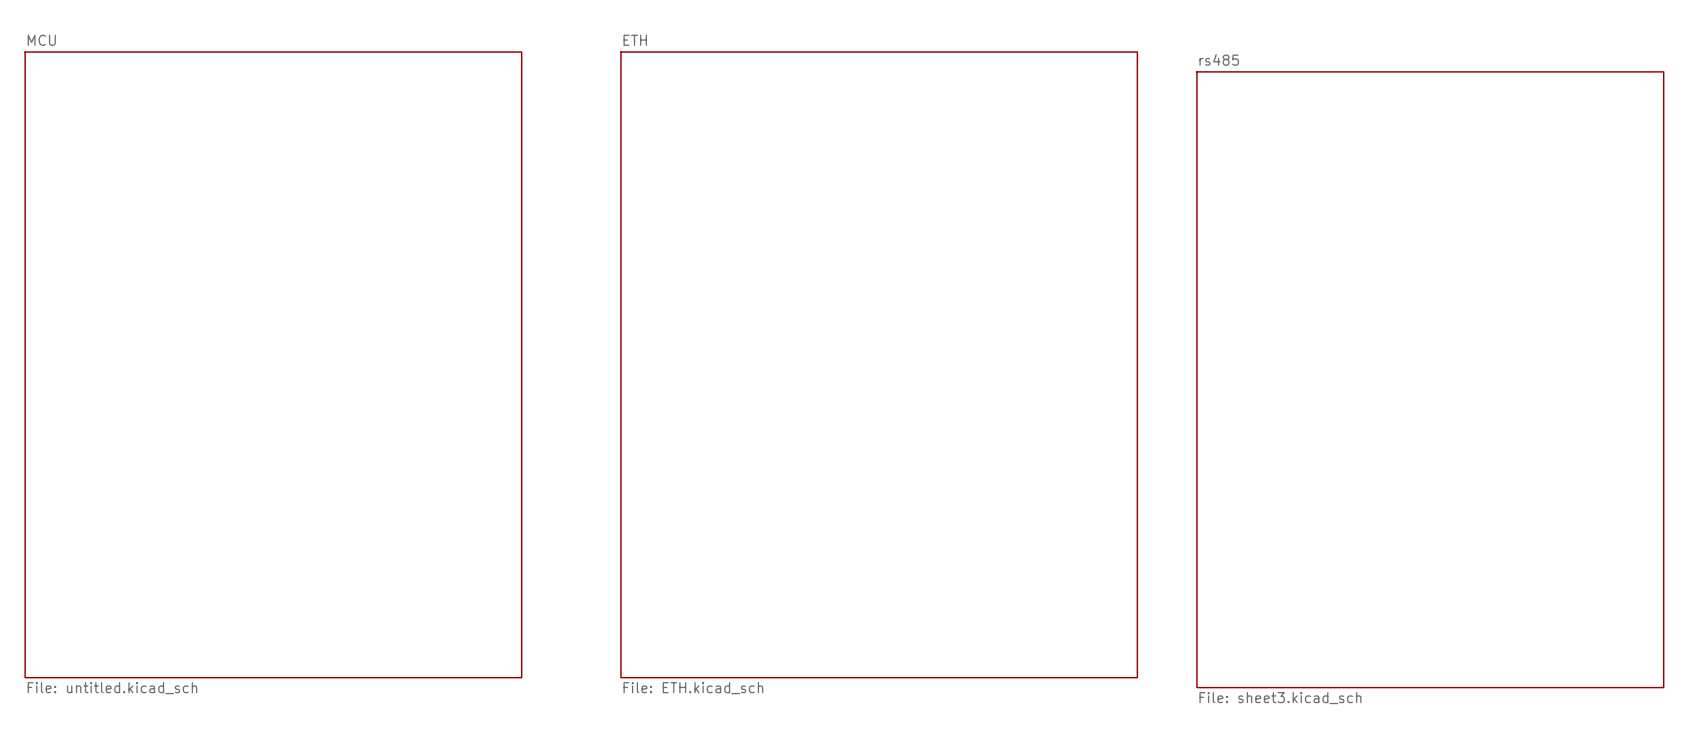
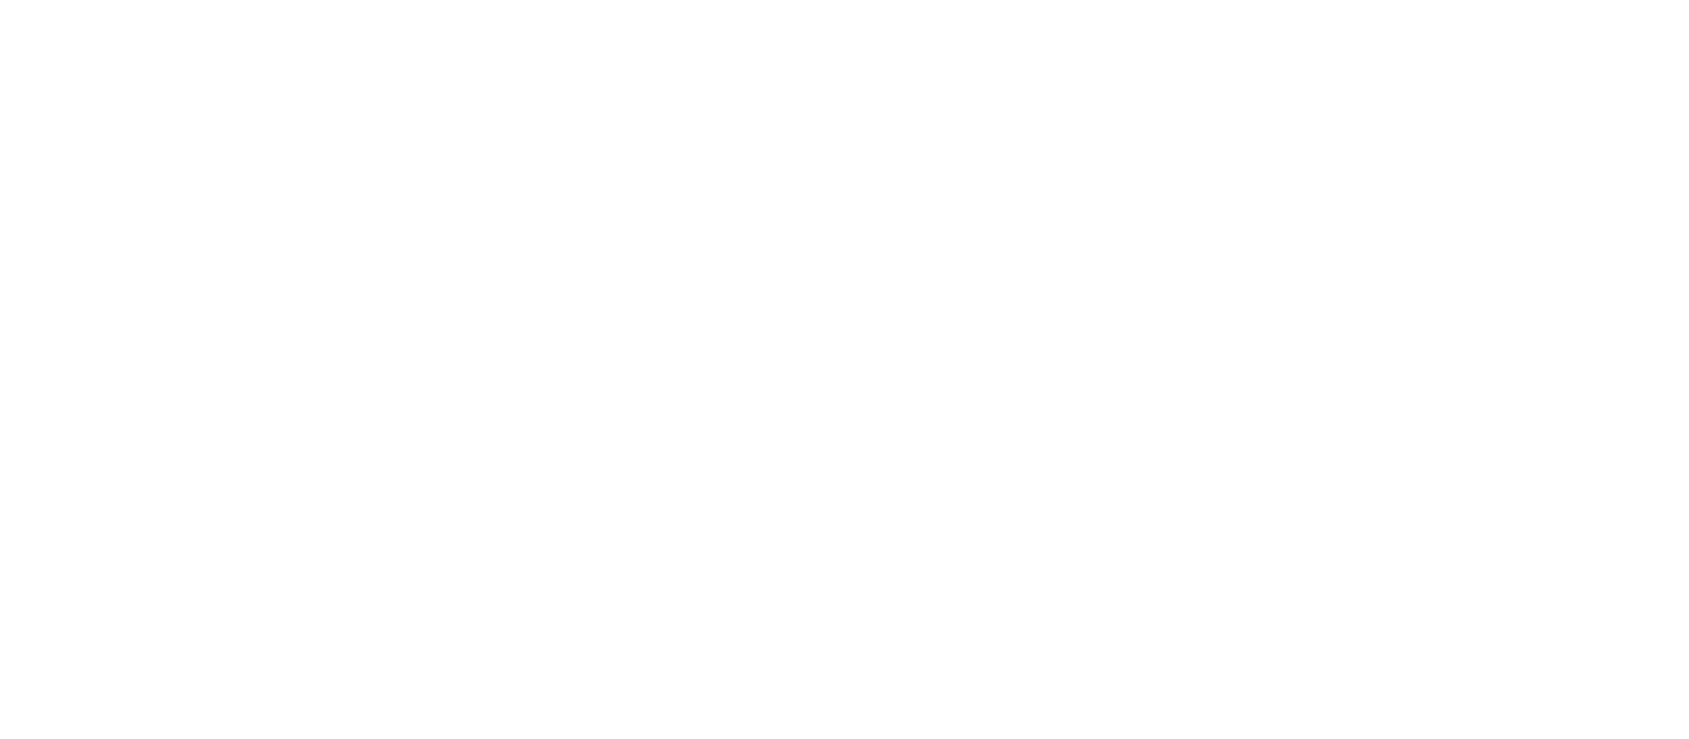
sheet MCU: File: untitled.kicad_sch (273, 364) -> none
sheet ETH: File: ETH.kicad_sch (879, 364) -> none
sheet rs485: File: sheet3.kicad_sch (1430, 379) -> none

